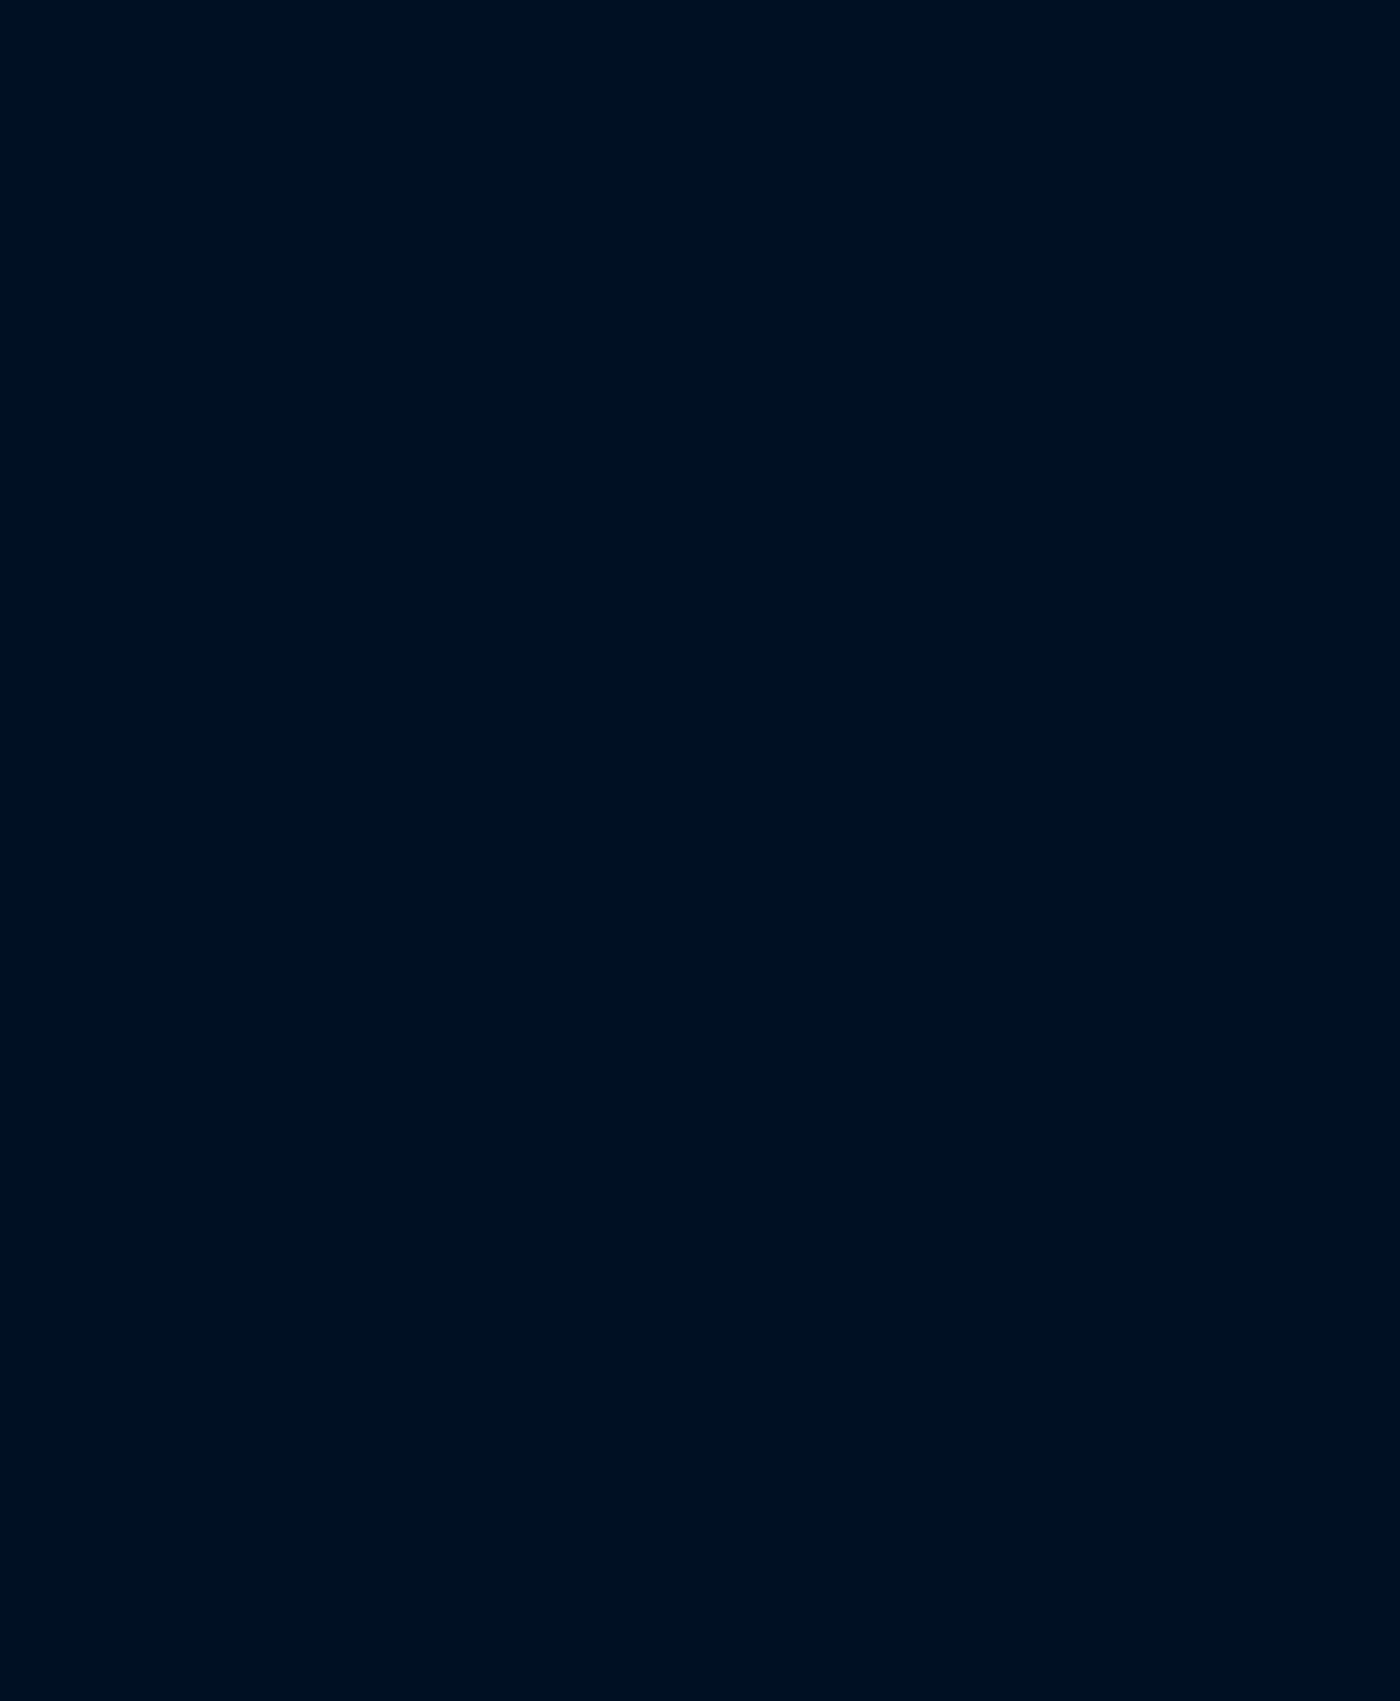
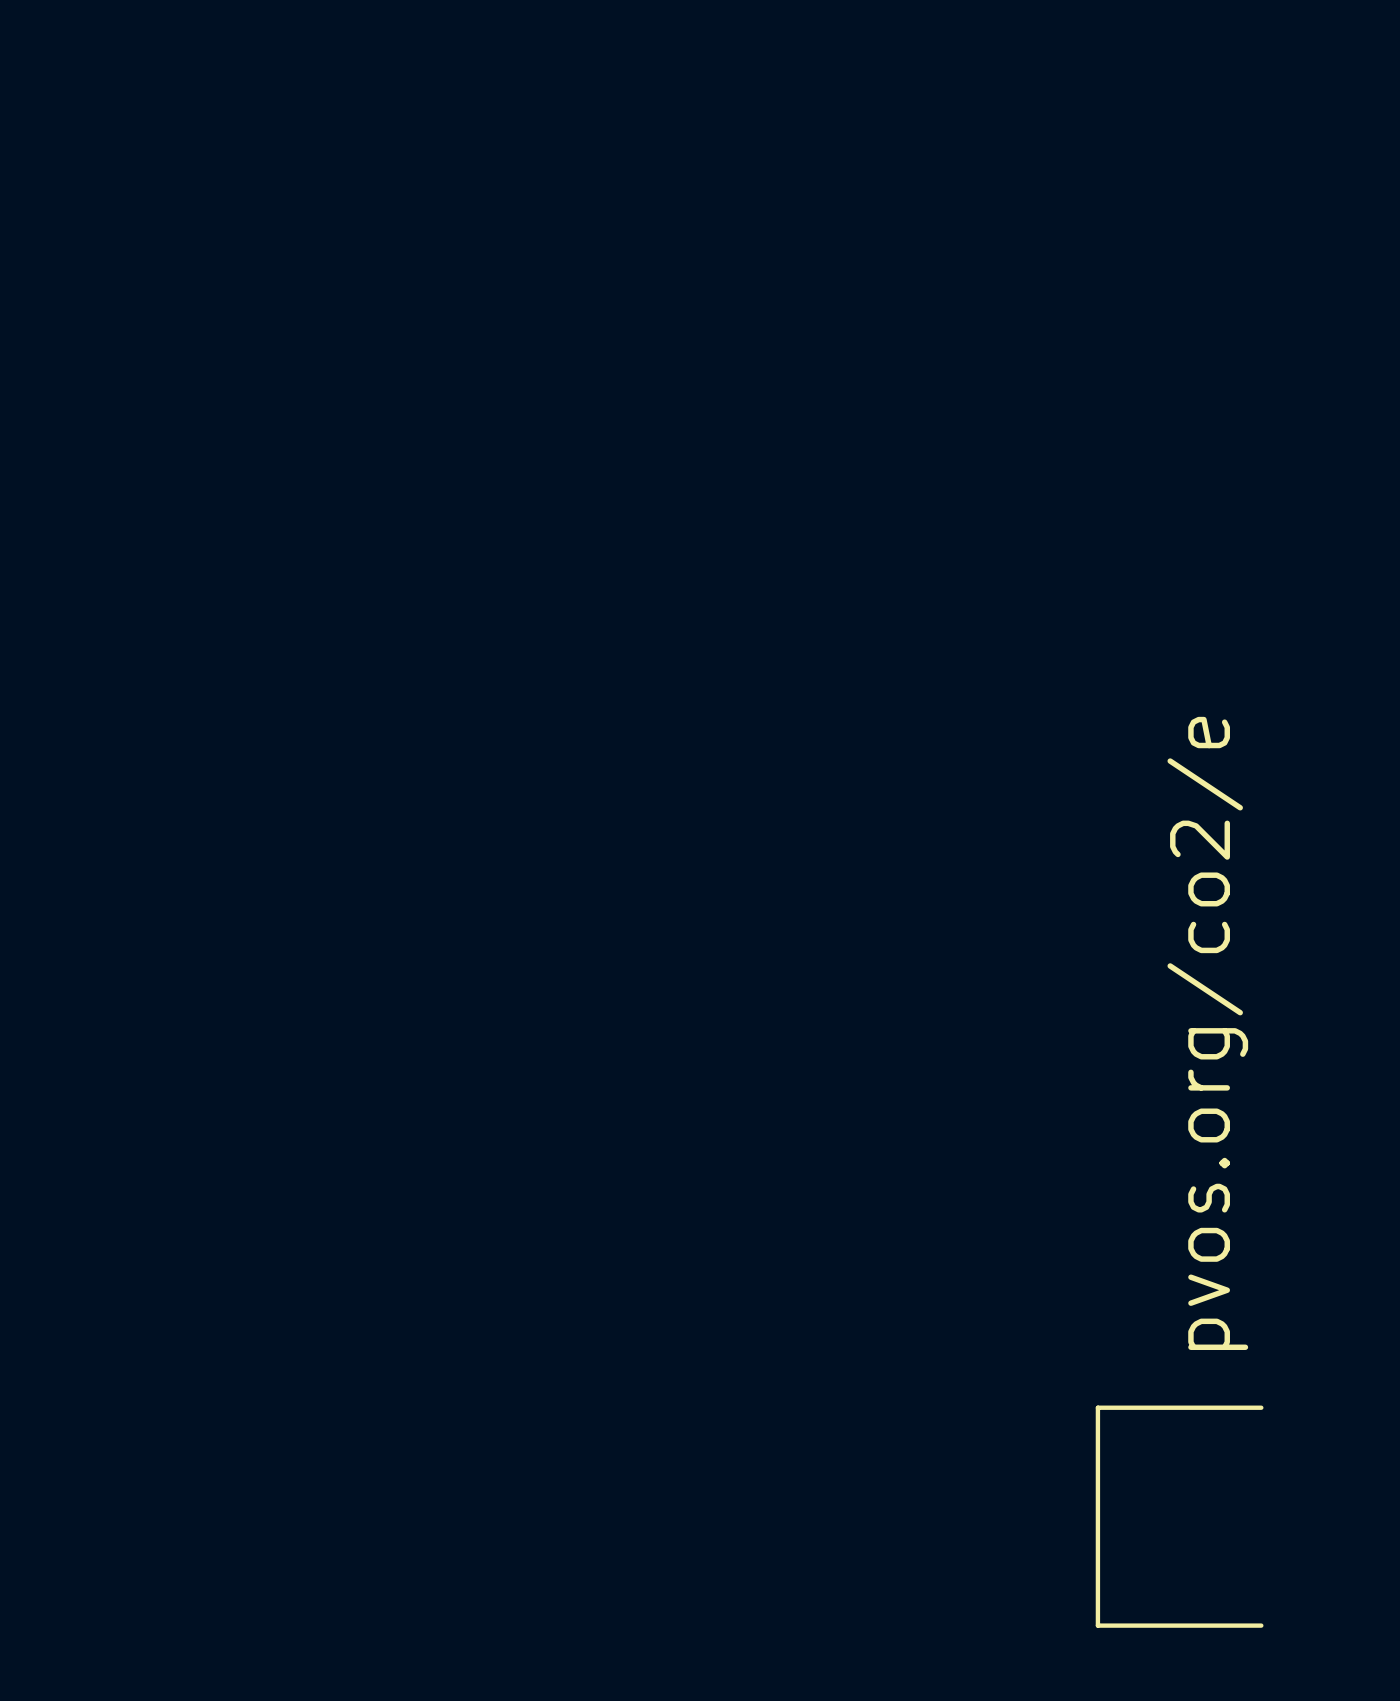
text: none -> pvos.org/co2/e (1207, 1033)
line: none -> (1261, 1407) (1097, 1407) (1097, 1625) (1261, 1625)

